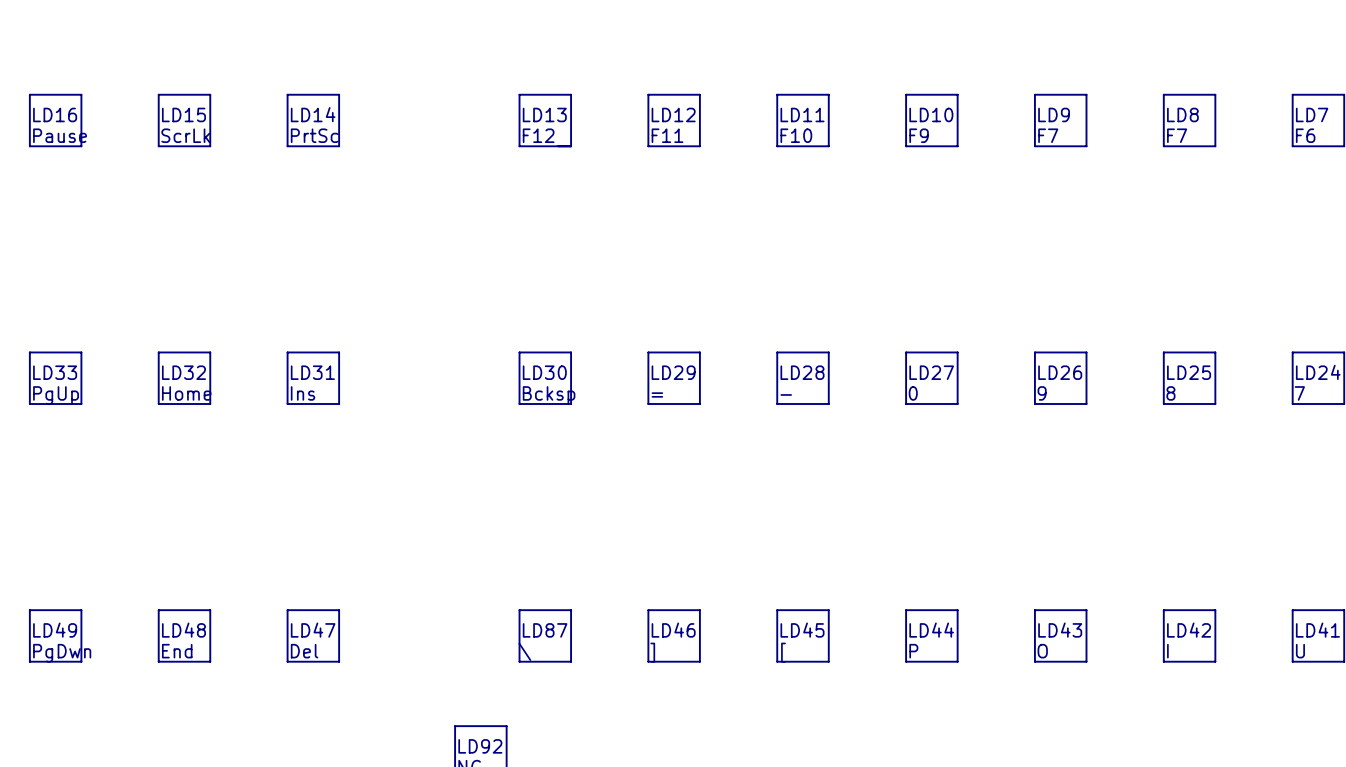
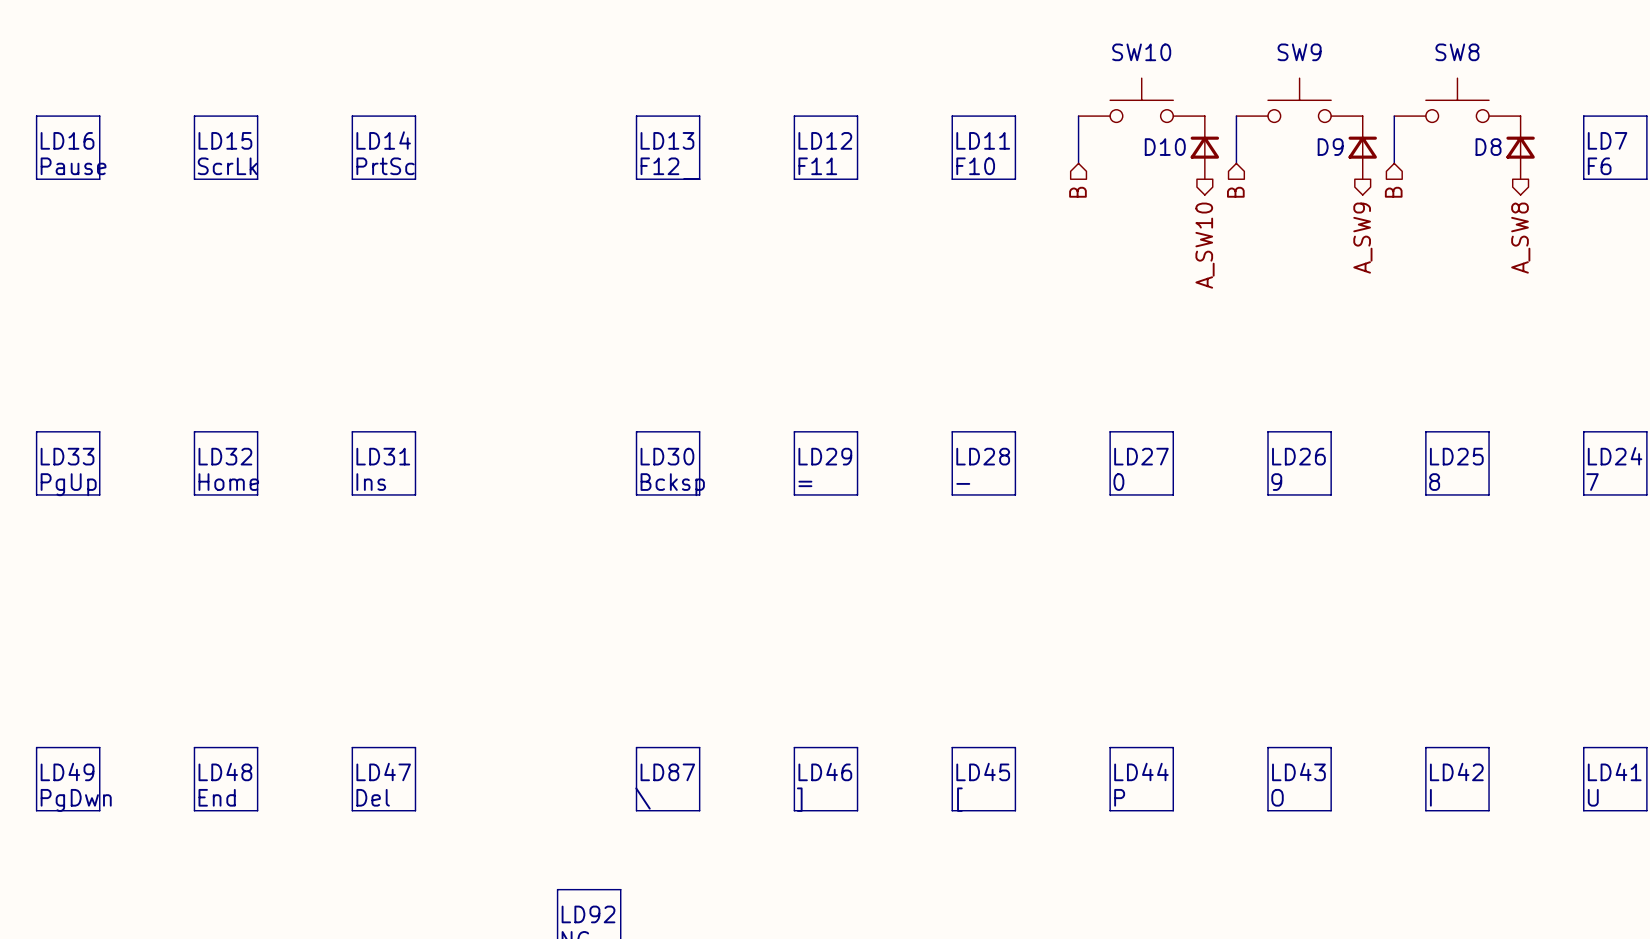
SW10: none -> (1141, 100)
SW9: none -> (1299, 100)
SW8: none -> (1457, 100)
wire: none -> (1078, 116) (1078, 163)
line: (906, 94) (957, 94) (957, 146) (906, 146) (906, 94) -> none
wire: none -> (1236, 116) (1236, 163)
line: (1034, 94) (1086, 94) (1086, 146) (1034, 146) (1034, 94) -> none
wire: none -> (1394, 116) (1394, 163)
line: (1163, 94) (1163, 146) (1215, 146) (1215, 94) (1163, 94) -> none
text: LD10 (931, 114) -> none
text: LD9 (1054, 114) -> none
text: LD8 (1182, 114) -> none
D10: none -> (1204, 147)
D9: none -> (1362, 147)
D8: none -> (1520, 147)
text: F9 (919, 135) -> none
text: F7 (1048, 135) -> none
text: F7 (1177, 135) -> none
hierarchical label: none -> B (1077, 192)
hierarchical label: none -> B (1235, 192)
hierarchical label: none -> B (1393, 192)
hierarchical label: none -> A_SW9 (1362, 238)
hierarchical label: none -> A_SW8 (1520, 238)
hierarchical label: none -> A_SW10 (1205, 245)

